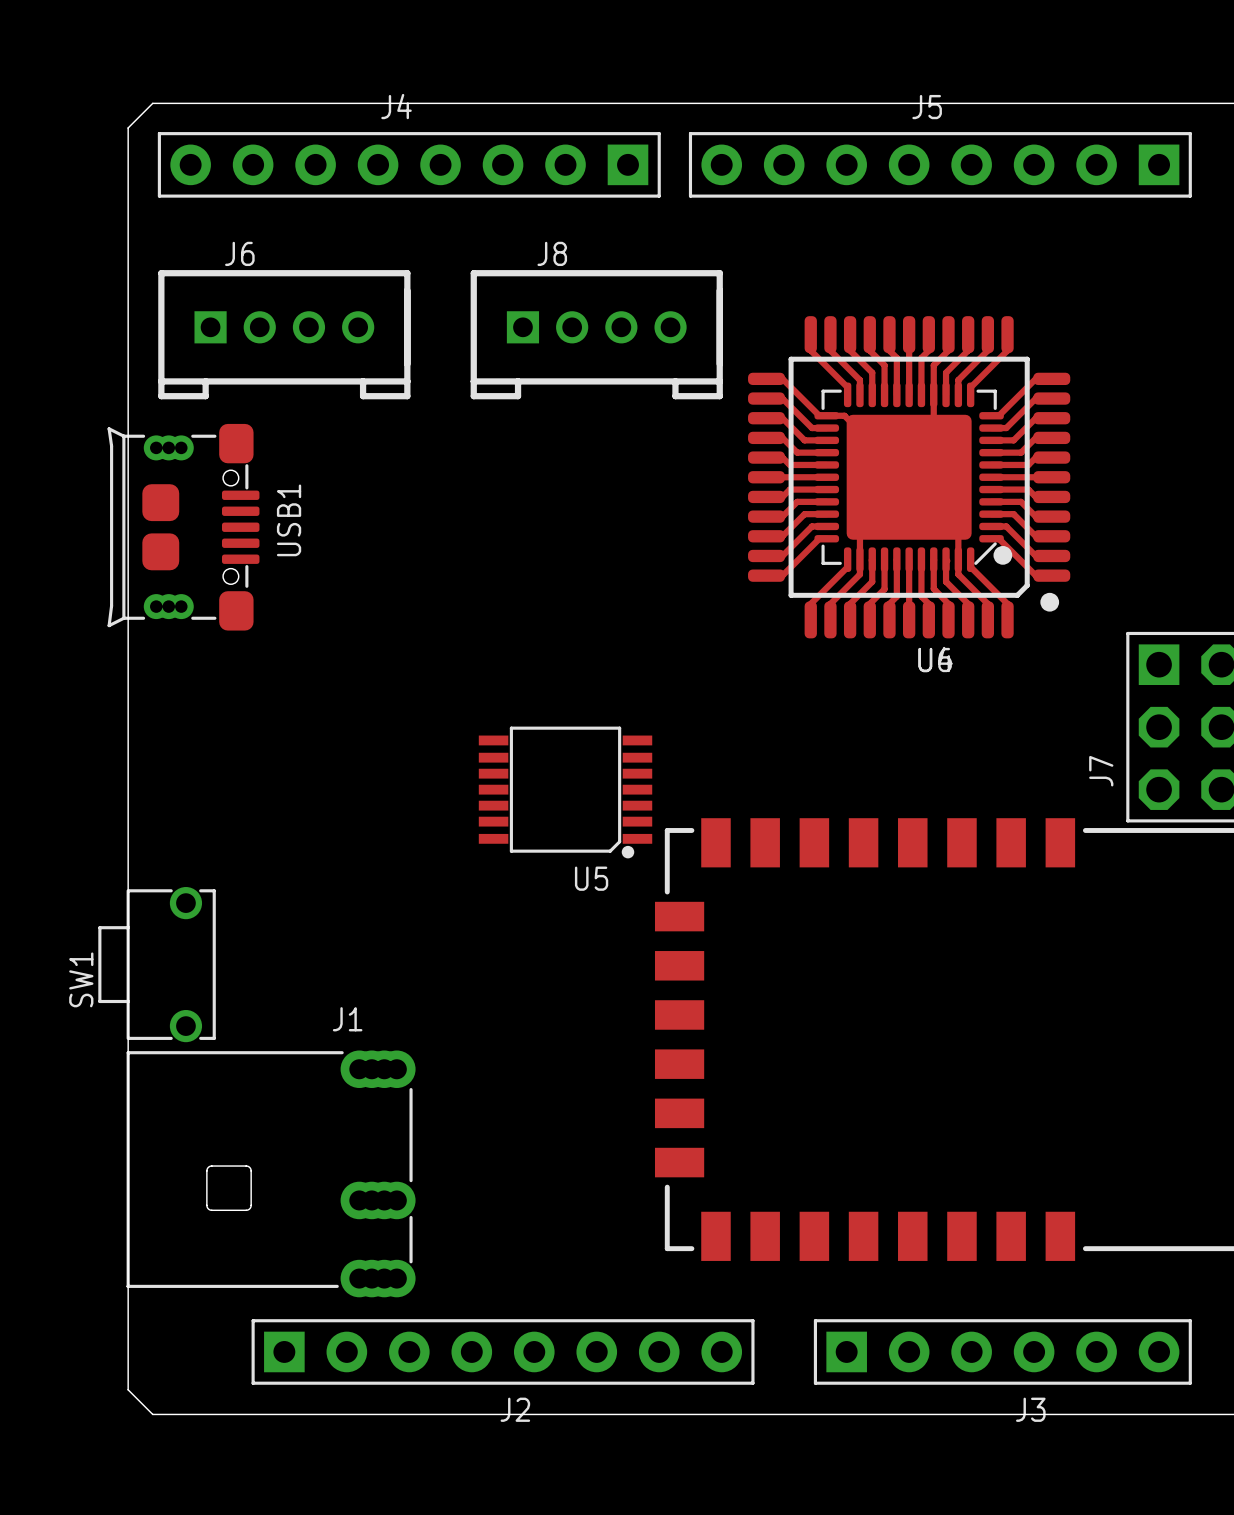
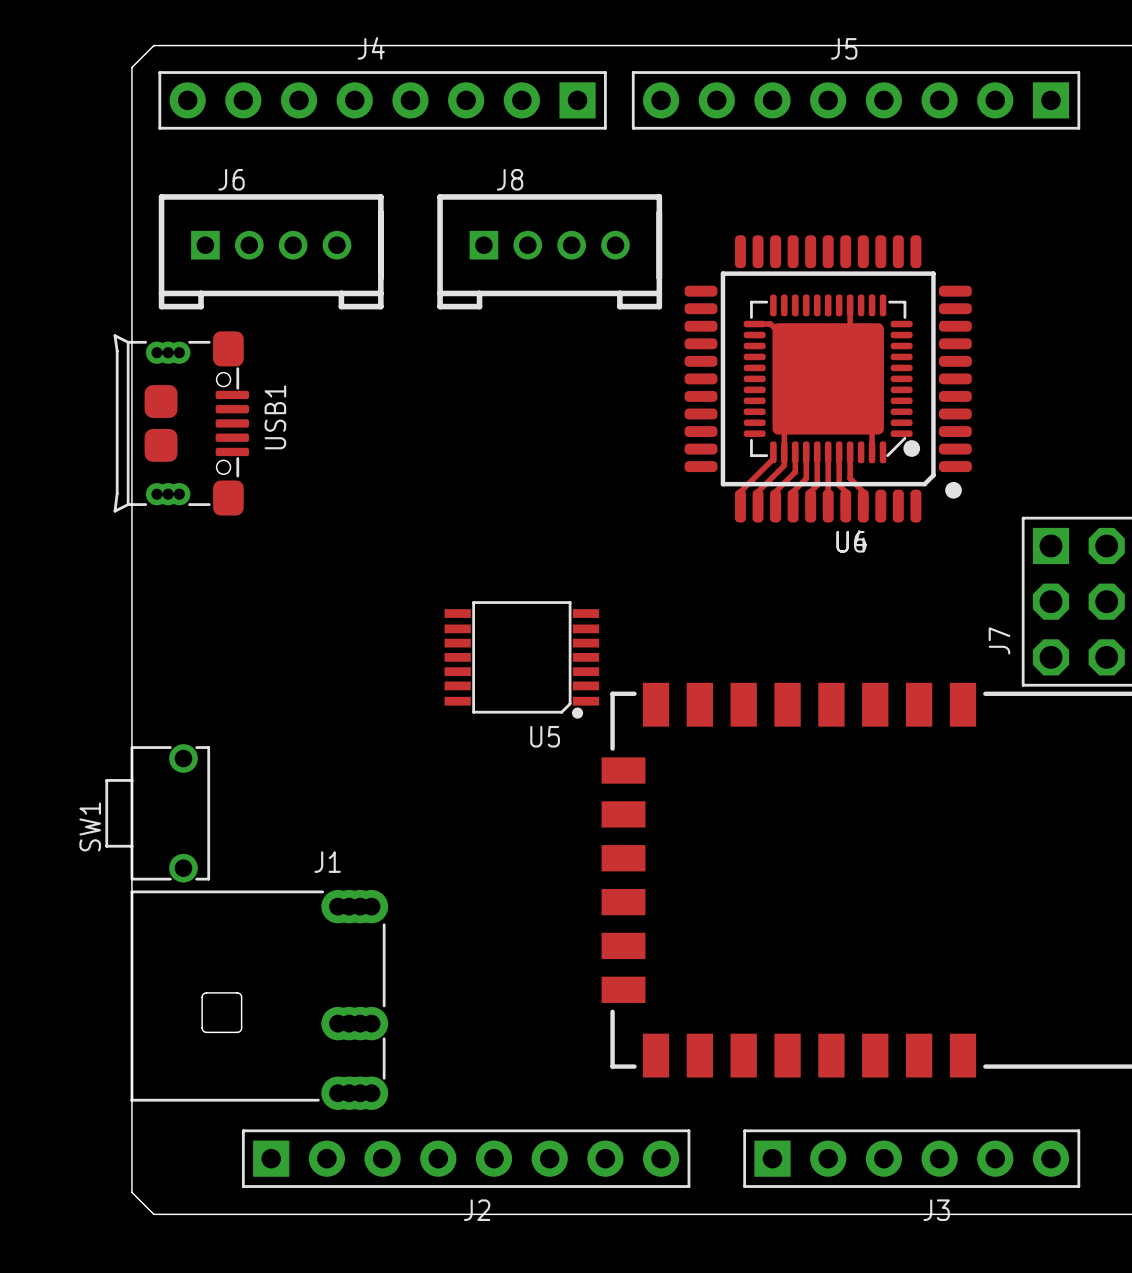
track: (810, 334) (810, 350) (847, 387) (847, 394) -> none
track: (830, 334) (830, 350) (859, 380) (859, 394) -> none
track: (850, 334) (850, 350) (872, 372) (872, 394) -> none
track: (869, 334) (869, 350) (884, 365) (884, 394) -> none
track: (889, 334) (889, 350) (896, 357) (896, 394) -> none
track: (909, 334) (909, 394) -> none
track: (928, 334) (928, 350) (921, 357) (921, 394) -> none
track: (948, 334) (948, 350) (933, 365) (933, 394) -> none
track: (968, 334) (968, 350) (946, 372) (946, 394) -> none
track: (987, 334) (987, 350) (958, 380) (958, 394) -> none
track: (1007, 334) (1007, 350) (970, 387) (970, 394) -> none
track: (766, 378) (782, 378) (819, 415) (826, 415) -> none
track: (1051, 378) (1035, 378) (998, 415) (991, 415) -> none
track: (766, 398) (782, 398) (811, 428) (826, 428) -> none
track: (1051, 398) (1035, 398) (1006, 428) (991, 428) -> none
track: (766, 418) (782, 418) (804, 440) (826, 440) -> none
track: (1051, 418) (1035, 418) (1013, 440) (991, 440) -> none
track: (766, 437) (782, 437) (797, 452) (826, 452) -> none
track: (1051, 437) (1035, 437) (1021, 452) (991, 452) -> none
track: (766, 457) (782, 457) (789, 464) (826, 464) -> none
track: (1051, 457) (1035, 457) (1028, 464) (991, 464) -> none
track: (766, 477) (826, 477) -> none
track: (991, 477) (1051, 477) -> none
track: (826, 489) (789, 489) (782, 496) (766, 496) -> none
track: (991, 489) (1028, 489) (1035, 496) (1051, 496) -> none
track: (826, 501) (797, 501) (782, 516) (766, 516) -> none
track: (991, 501) (1021, 501) (1035, 516) (1051, 516) -> none
track: (826, 514) (804, 514) (782, 536) (766, 536) -> none
track: (991, 514) (1013, 514) (1035, 536) (1051, 536) -> none
track: (826, 526) (811, 526) (782, 555) (766, 555) -> none
track: (991, 526) (1006, 526) (1035, 555) (1051, 555) -> none
track: (826, 538) (819, 538) (782, 575) (766, 575) -> none
track: (991, 538) (998, 538) (1035, 575) (1051, 575) -> none
track: (958, 559) (958, 574) (987, 603) (987, 619) -> none
track: (970, 559) (970, 567) (1007, 603) (1007, 619) -> none
track: (947, 560) (946, 559) (946, 581) (968, 603) (968, 619) -> none

